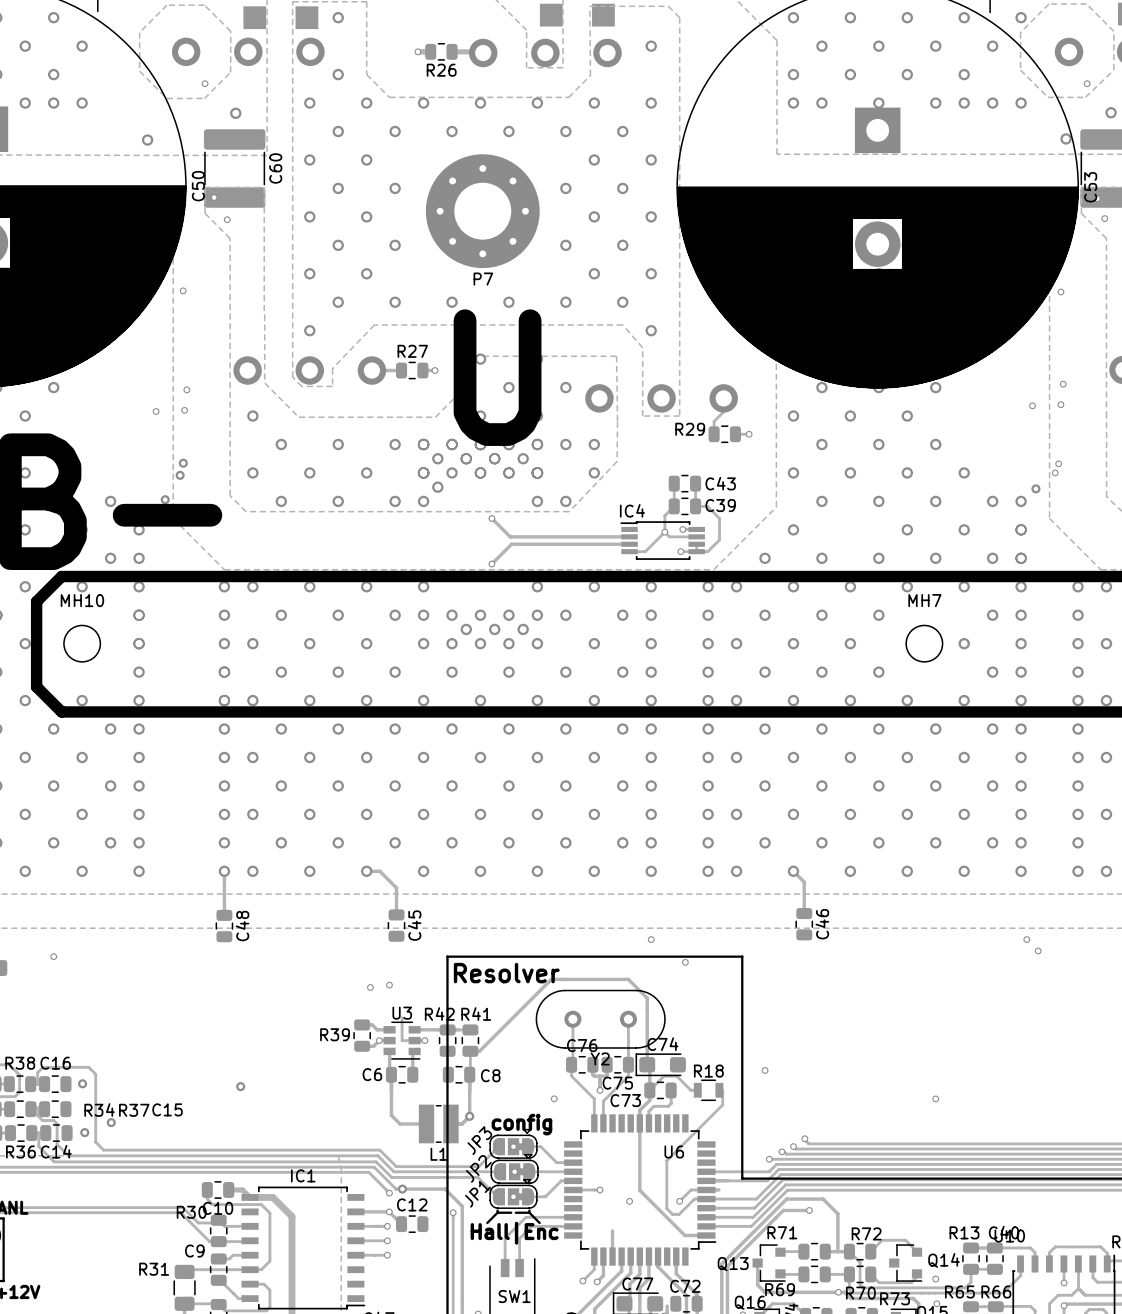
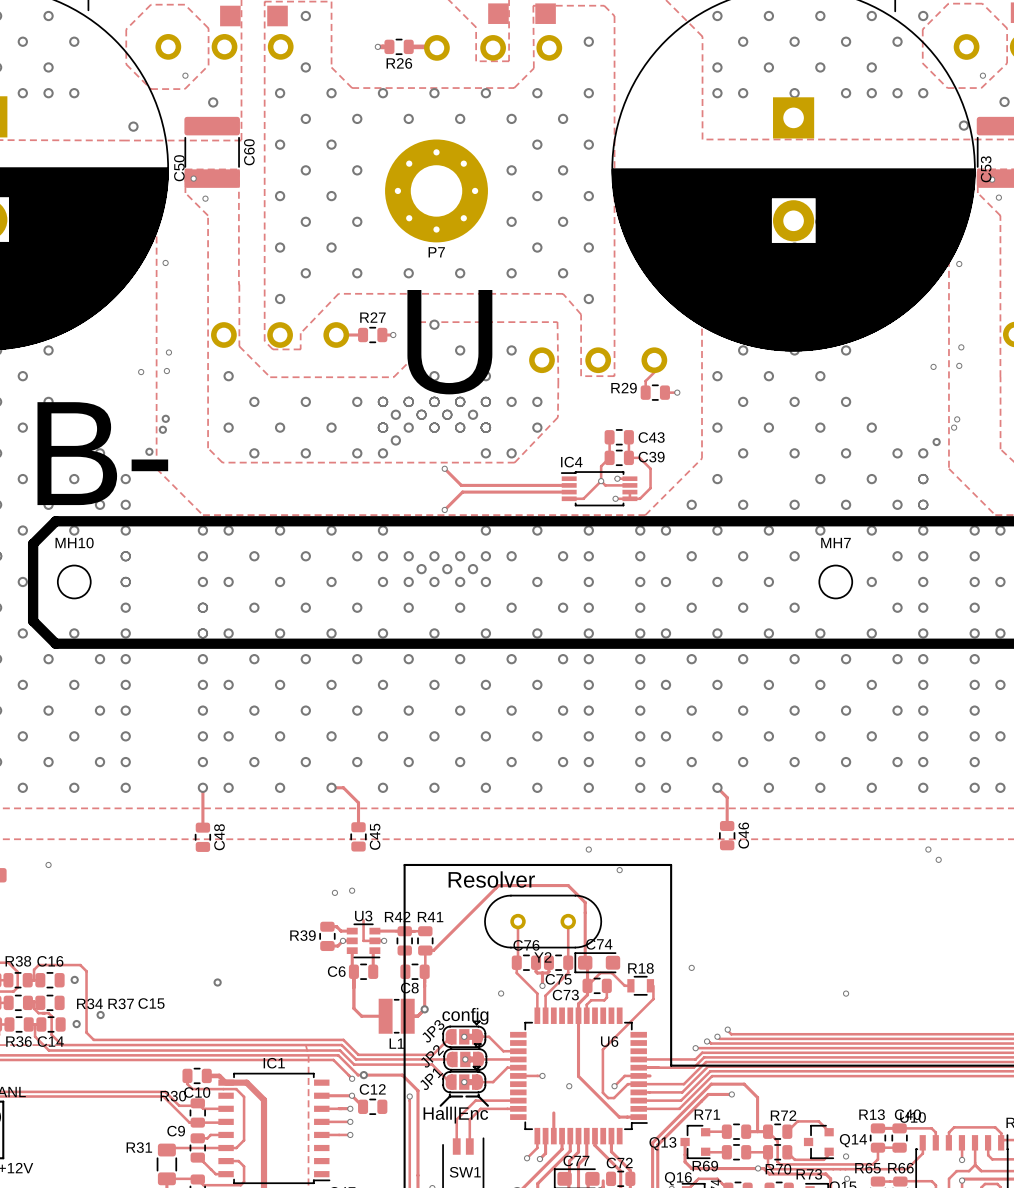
text position: Resolver (506, 973) -> Resolver (491, 879)
C8 name position: C8 (490, 1075) -> C8 (409, 988)

